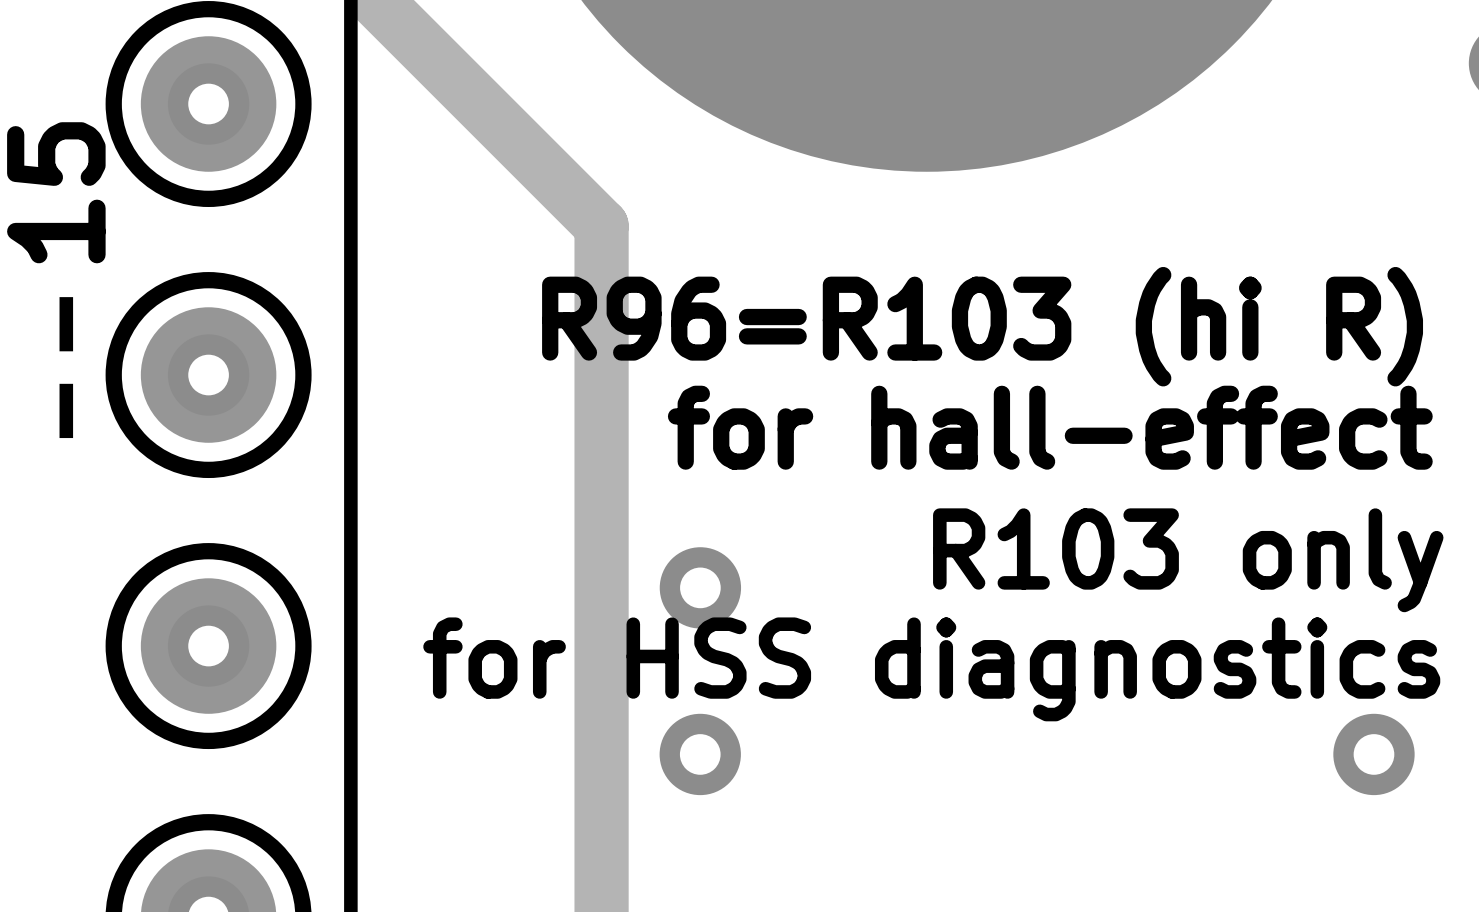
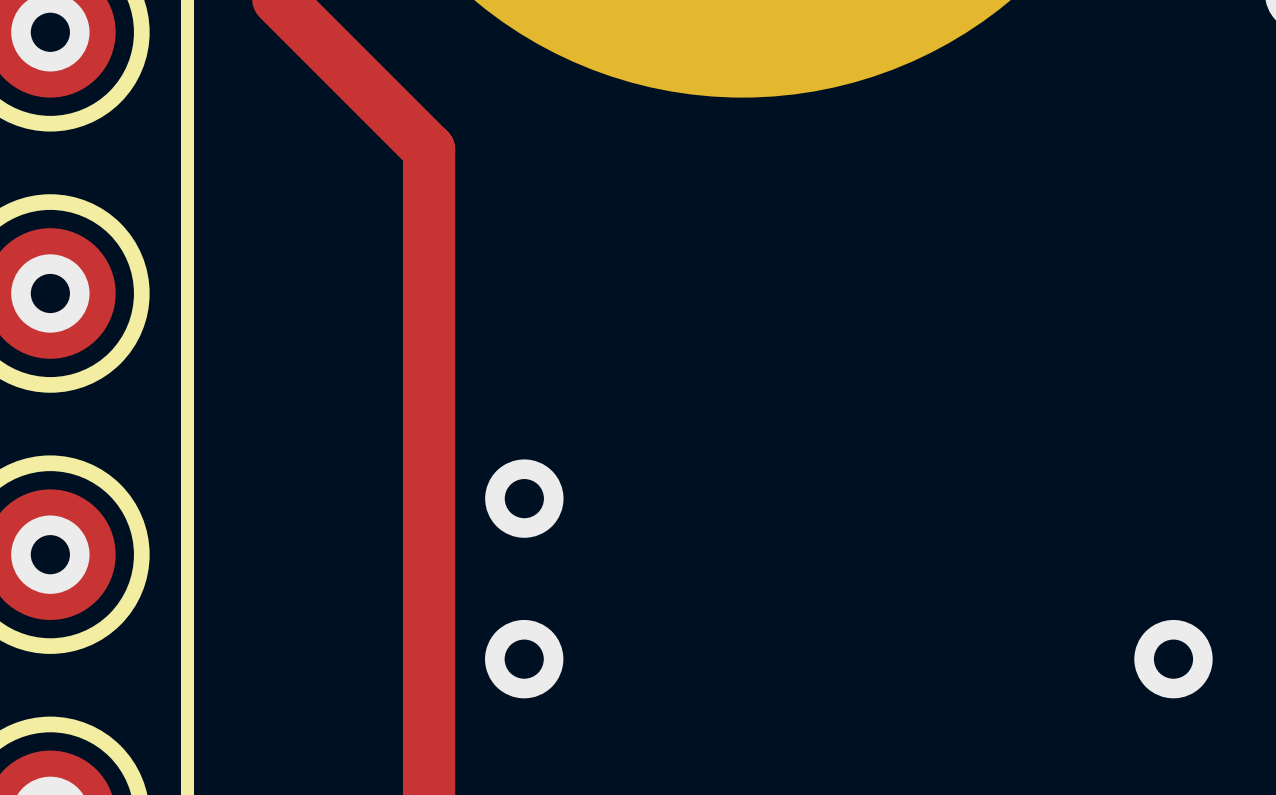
text: R96=R103 (hi R) (982, 326) -> none
text: for hall-effect (1050, 427) -> none
text: R103 only (1188, 560) -> none
text: for HSS diagnostics (931, 669) -> none

